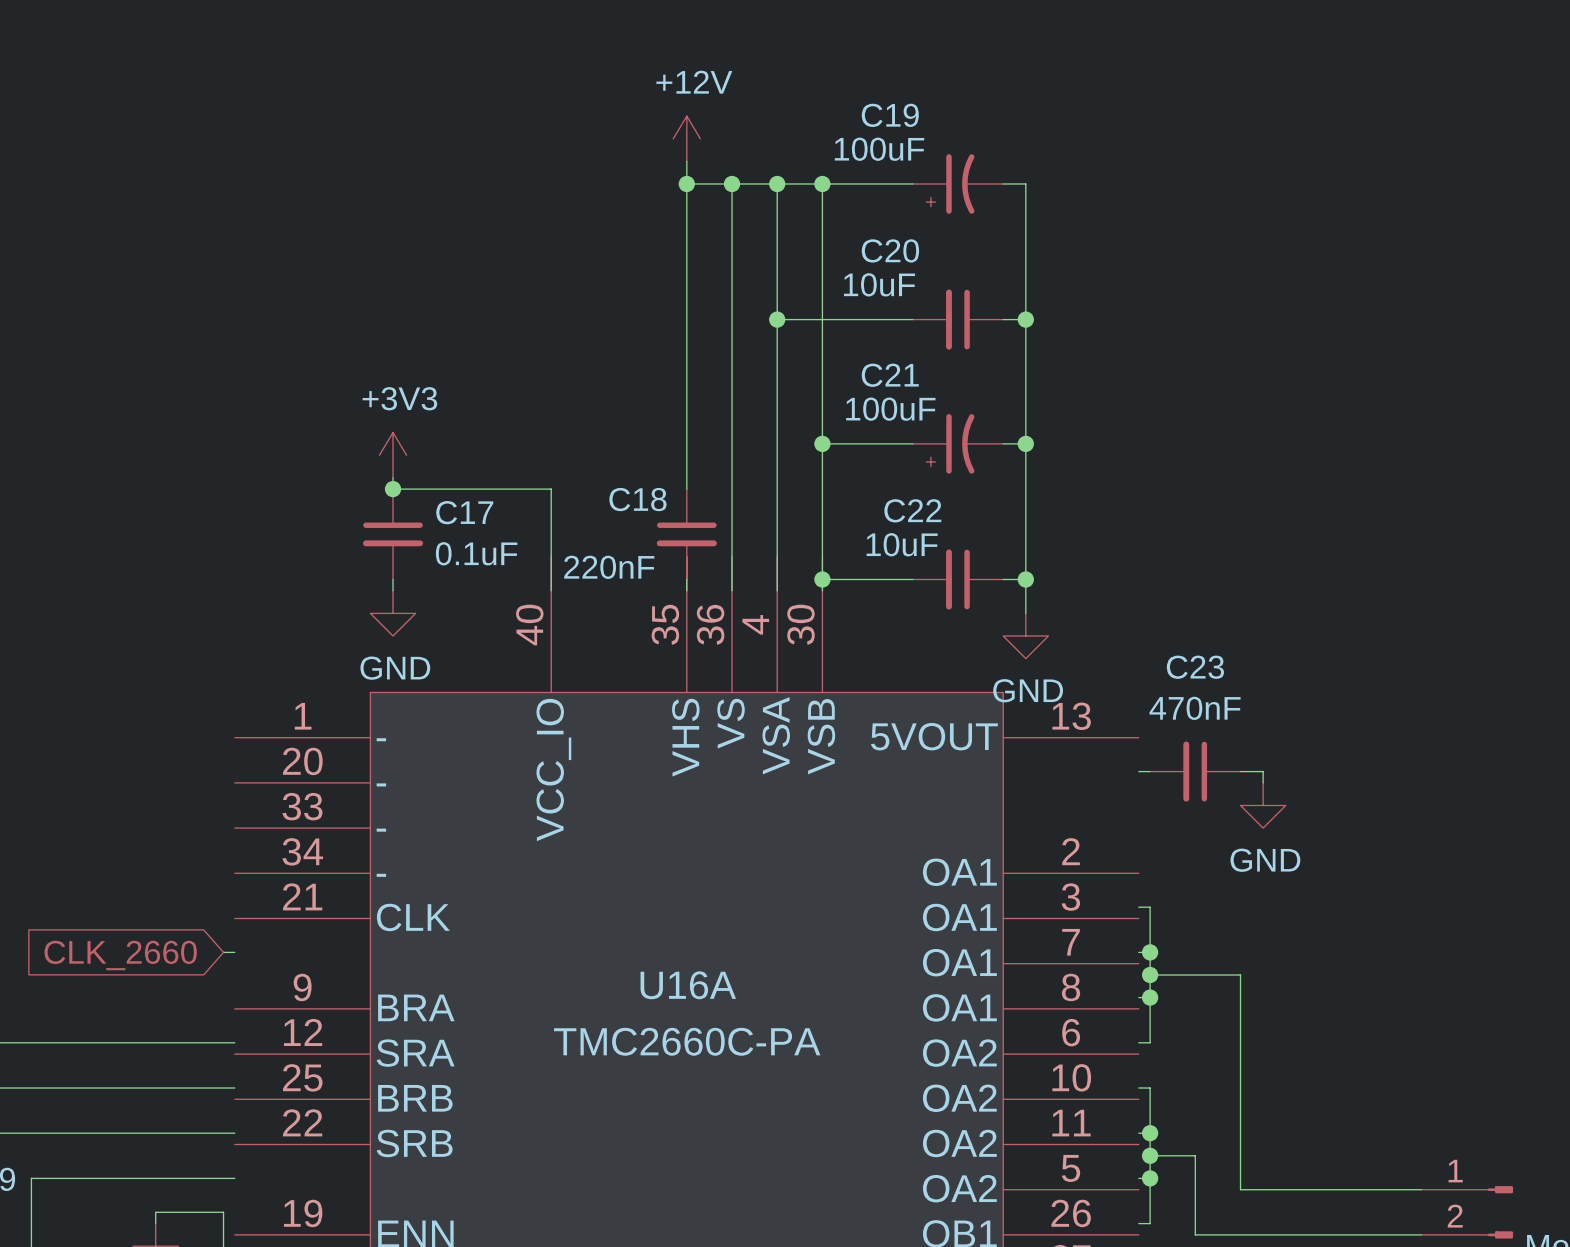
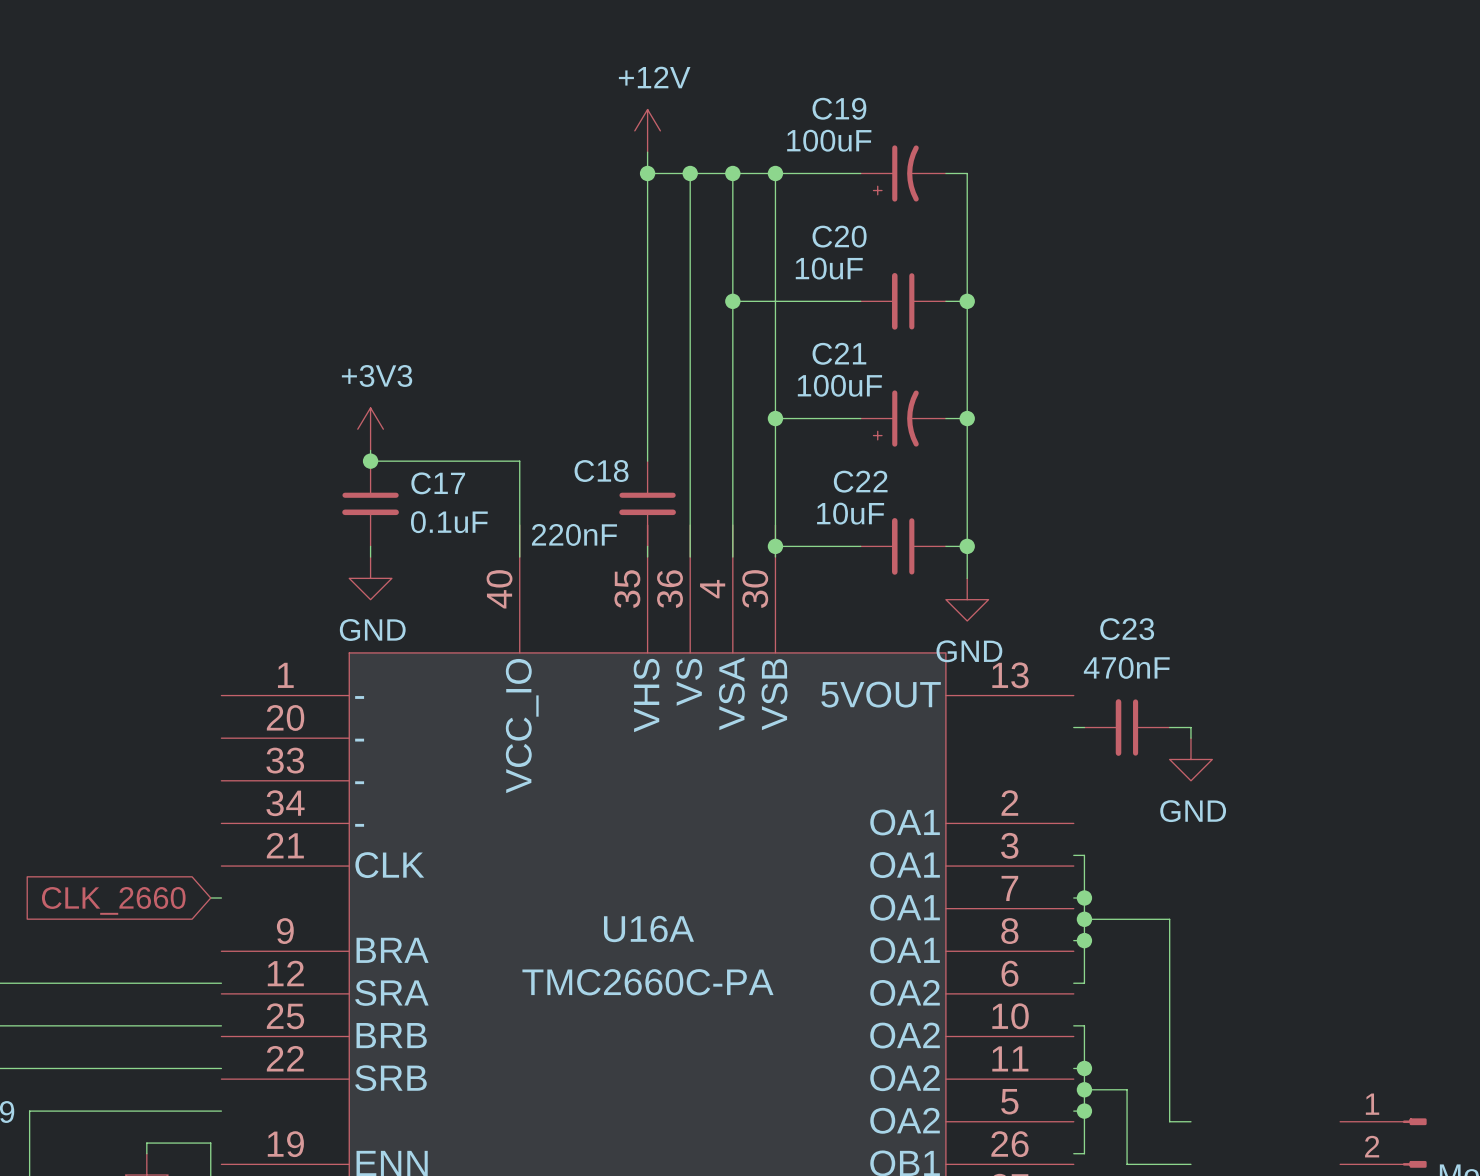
wire: (1263, 1189) (1421, 1189) -> none
wire: (1263, 1234) (1421, 1234) -> none

